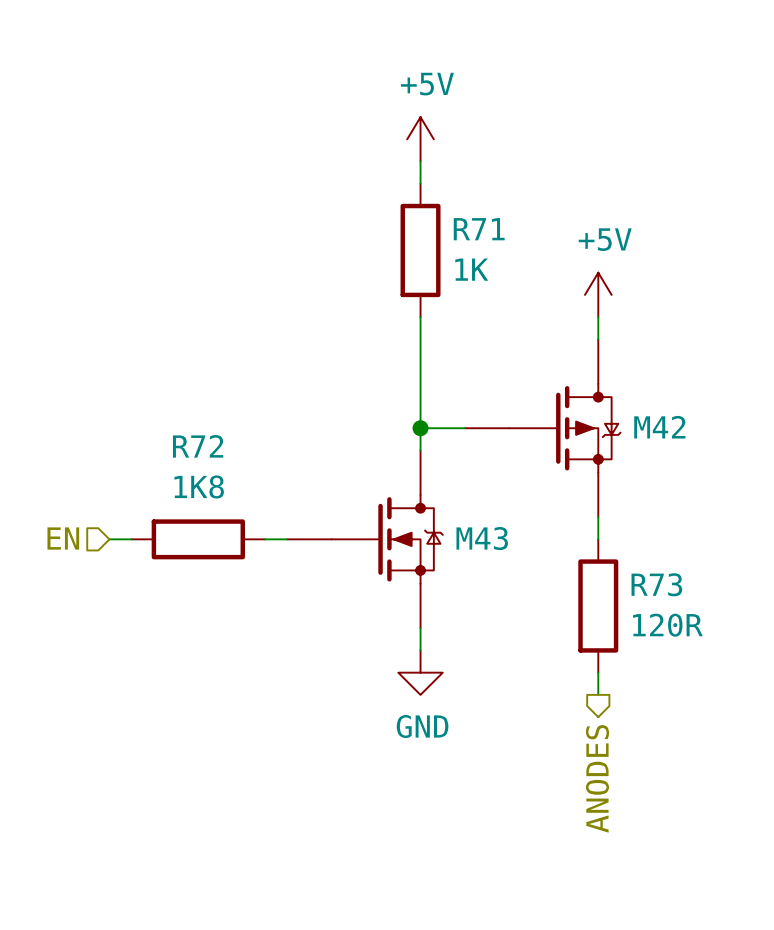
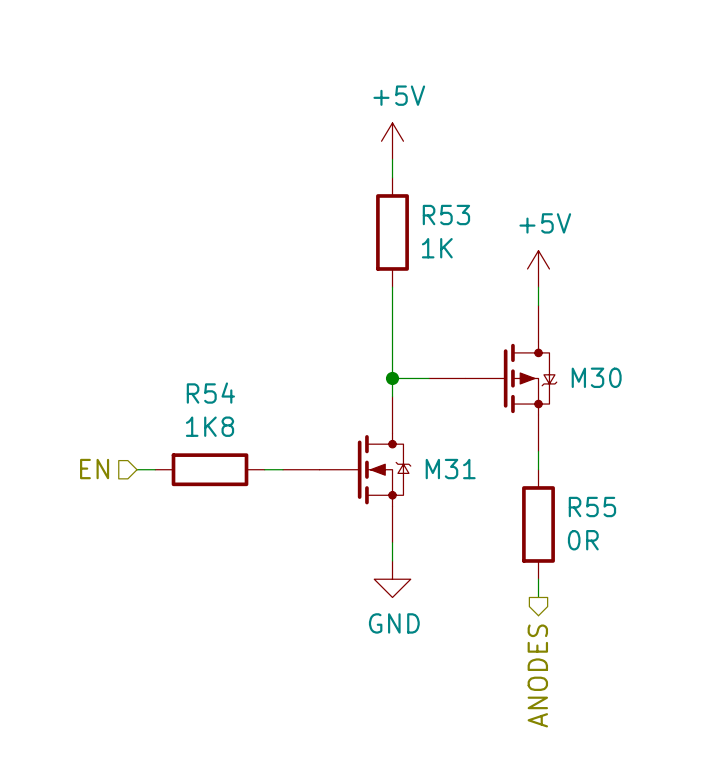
R71 name: R71 (479, 229) -> R53 (446, 215)
M42 name: M42 (659, 427) -> M30 (596, 377)
R72 name: R72 (198, 446) -> R54 (210, 393)
M43 name: M43 (482, 538) -> M31 (450, 469)
R73 name: R73 (656, 584) -> R55 (592, 507)
R73 value: 120R (667, 625) -> 0R (583, 540)

